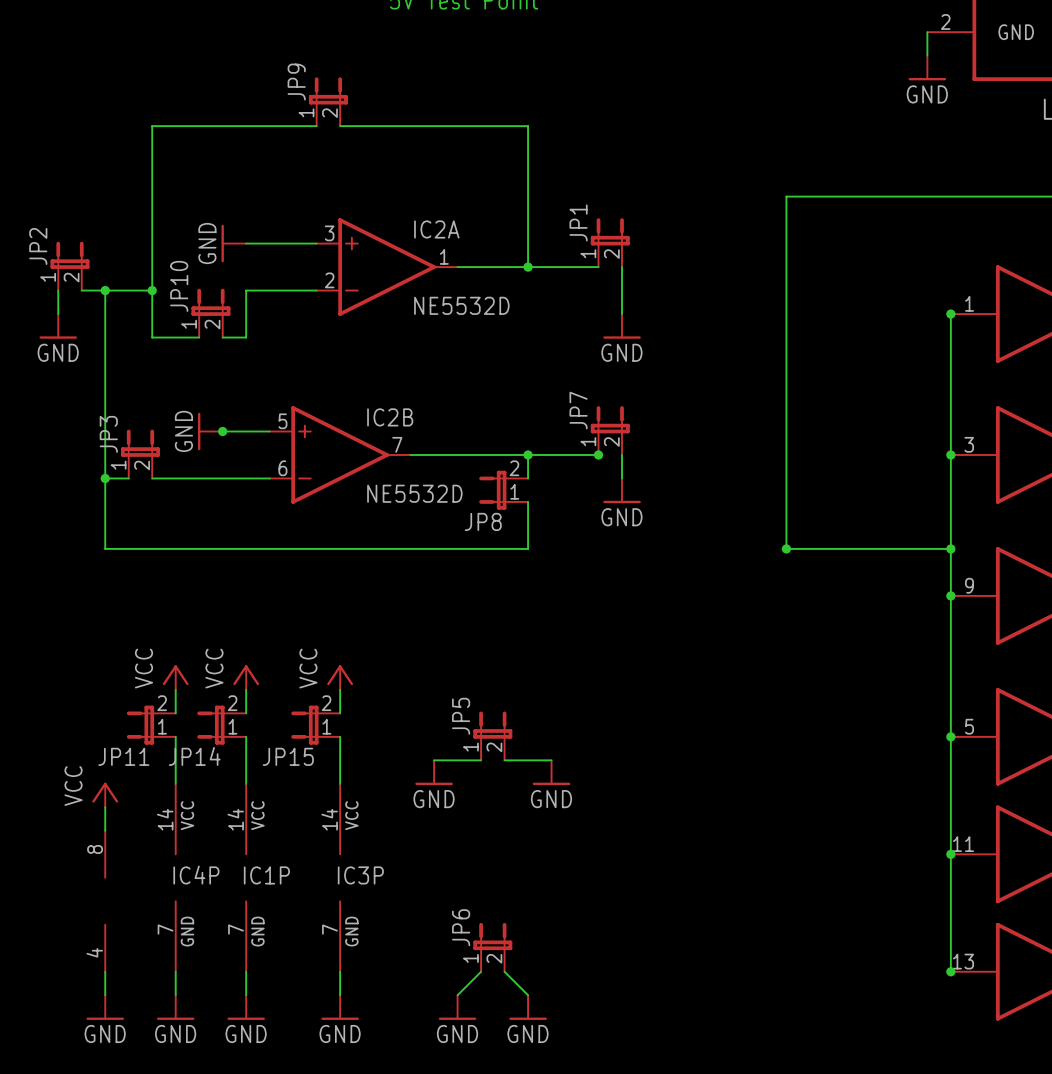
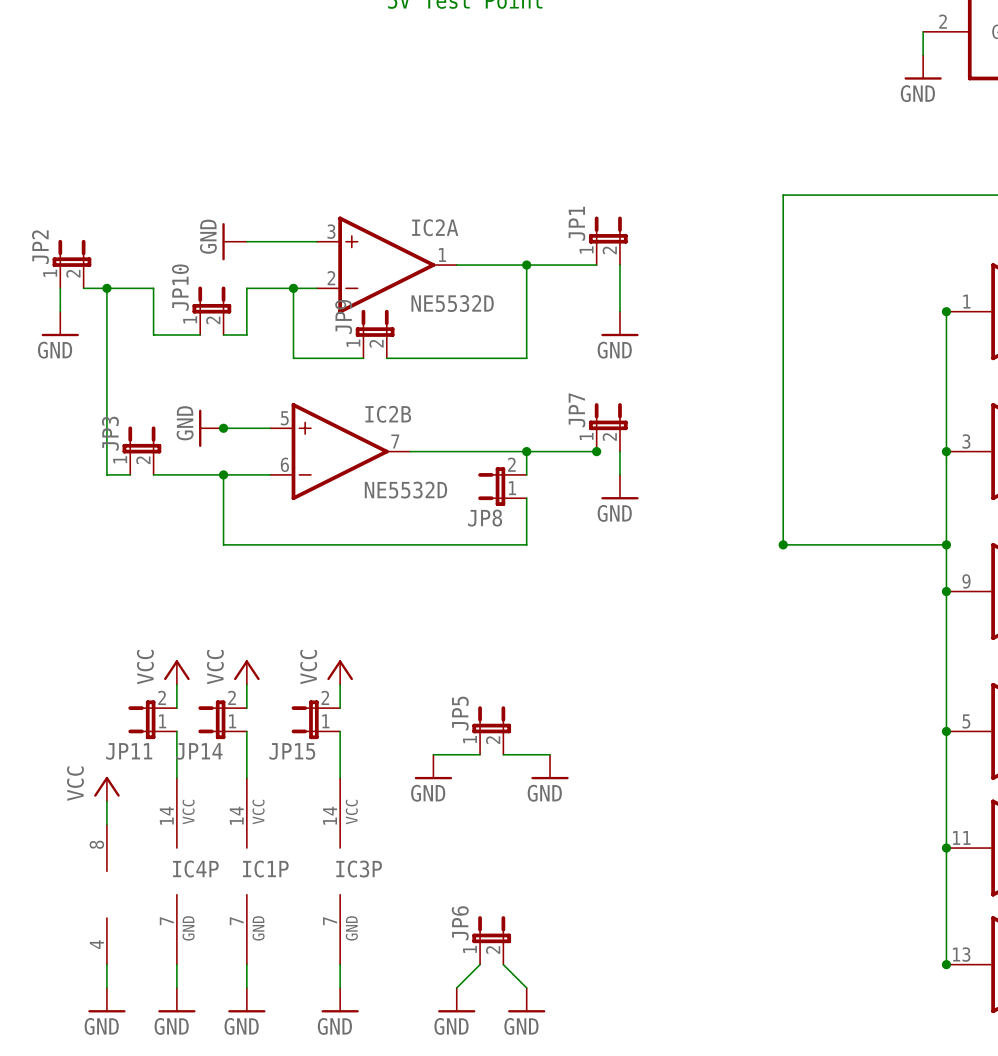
JP9 position: (328, 101) -> (375, 334)
wire: (316, 126) (152, 126) (152, 290) -> none
wire: (340, 126) (528, 126) (528, 267) -> (386, 358) (526, 358) (526, 265)
junction: (152, 290) -> none
wire: none -> (293, 288) (293, 358) (363, 358)
junction: none -> (293, 288)
wire: (105, 478) (105, 548) (222, 548) -> (223, 474) (223, 544)
junction: (105, 478) -> none
junction: none -> (223, 474)

